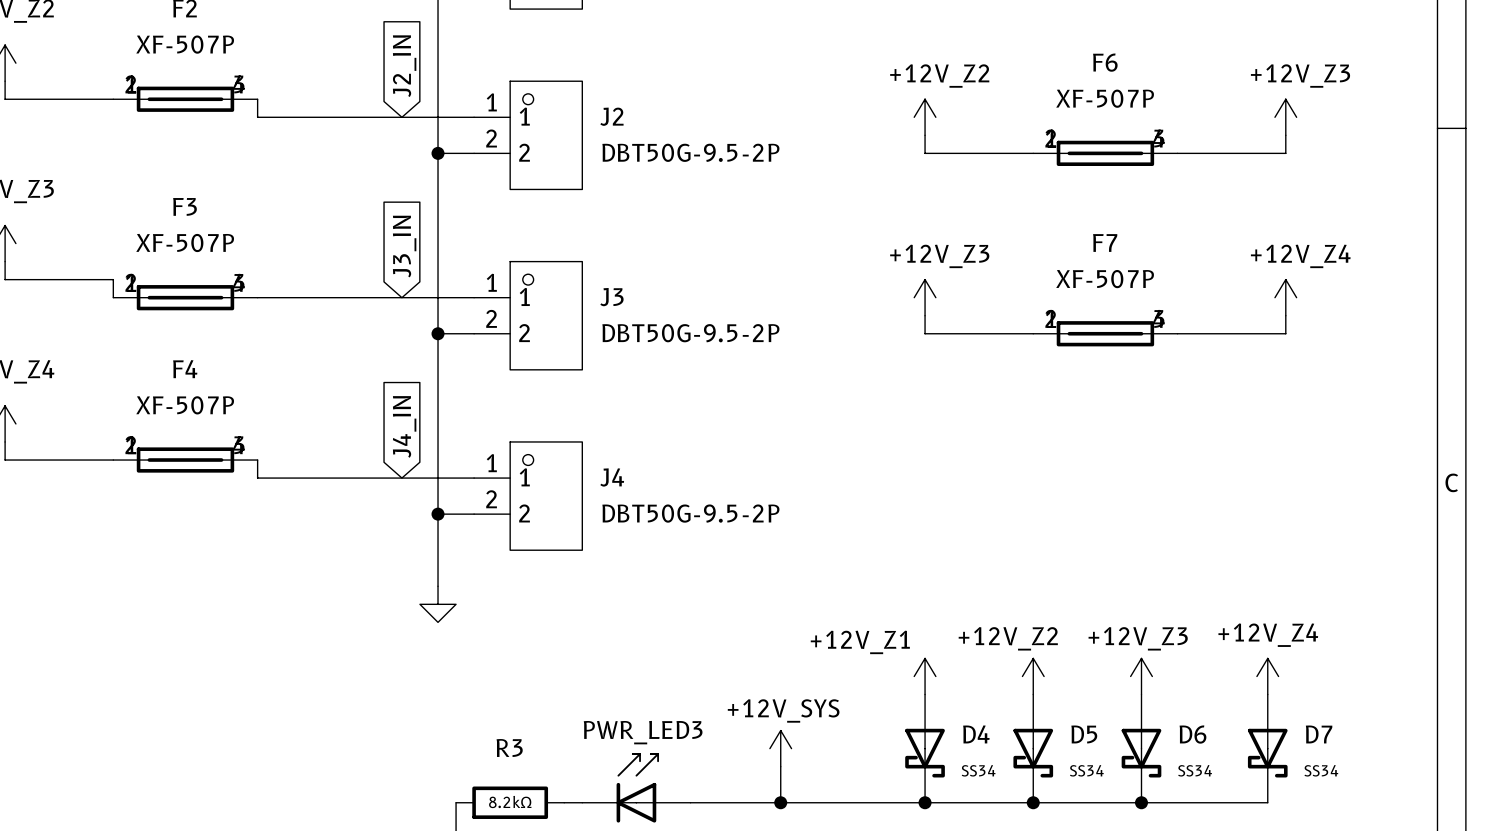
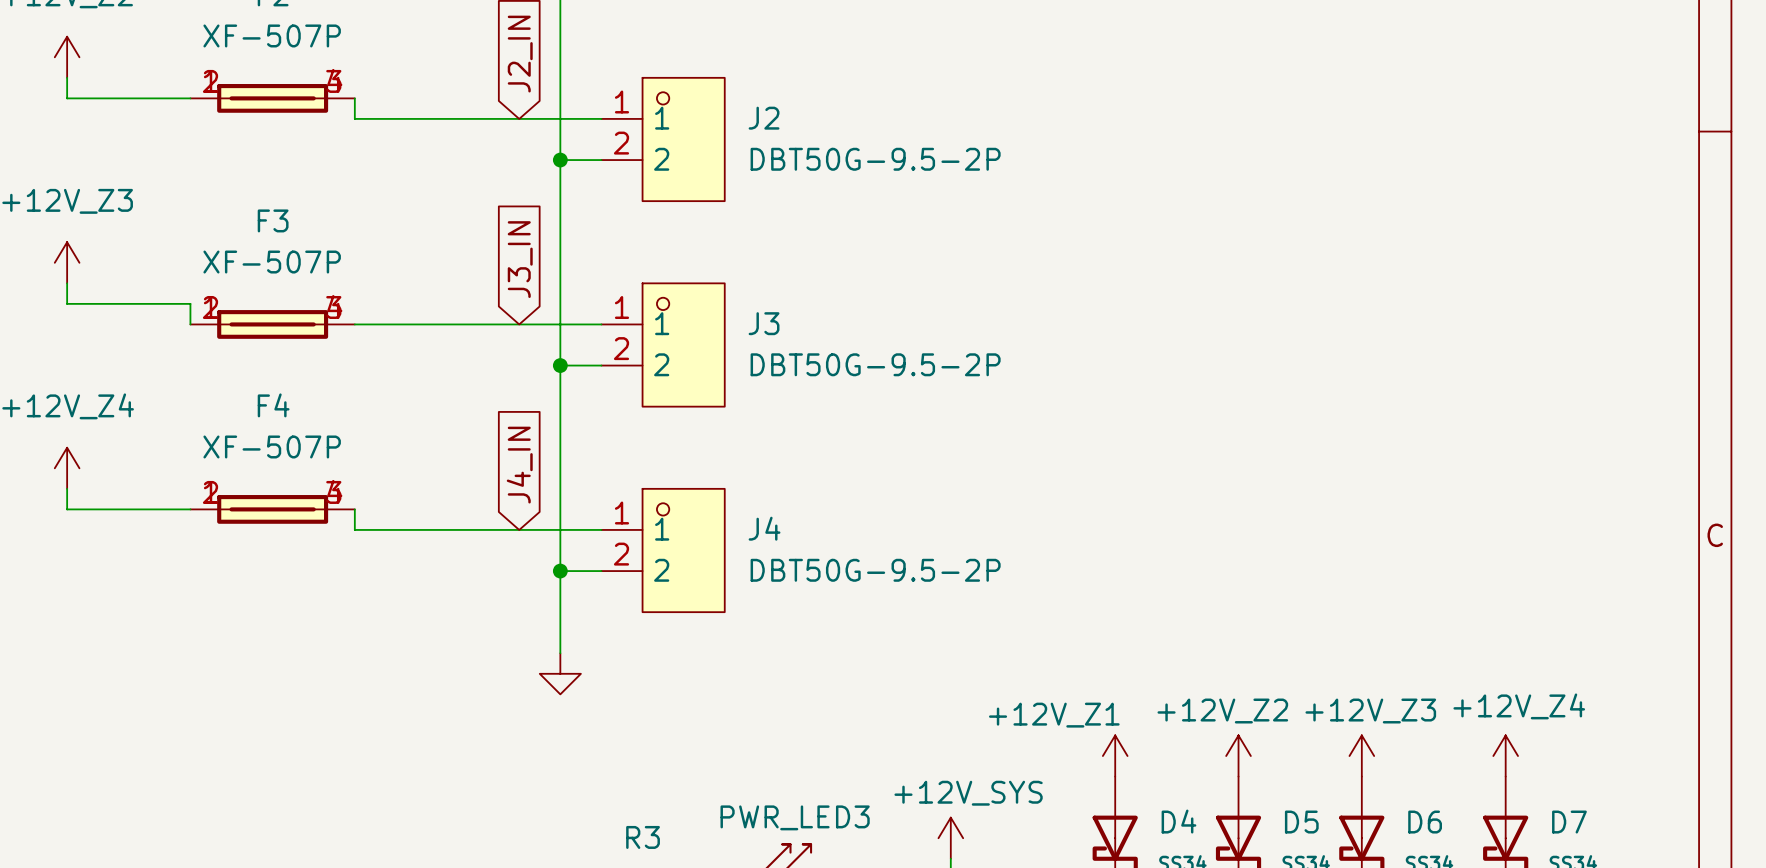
power symbol: +12V_Z2 (925, 117) -> none
power symbol: +12V_Z3 (1285, 117) -> none
wire: (925, 135) (925, 153) (1033, 153) -> none
wire: (1285, 135) (1285, 153) (1177, 153) -> none
F6: XF-507P (1105, 153) -> none
power symbol: +12V_Z3 (925, 297) -> none
power symbol: +12V_Z4 (1285, 297) -> none
wire: (925, 315) (925, 333) (1033, 333) -> none
wire: (1285, 315) (1285, 333) (1177, 333) -> none
F7: XF-507P (1105, 333) -> none

